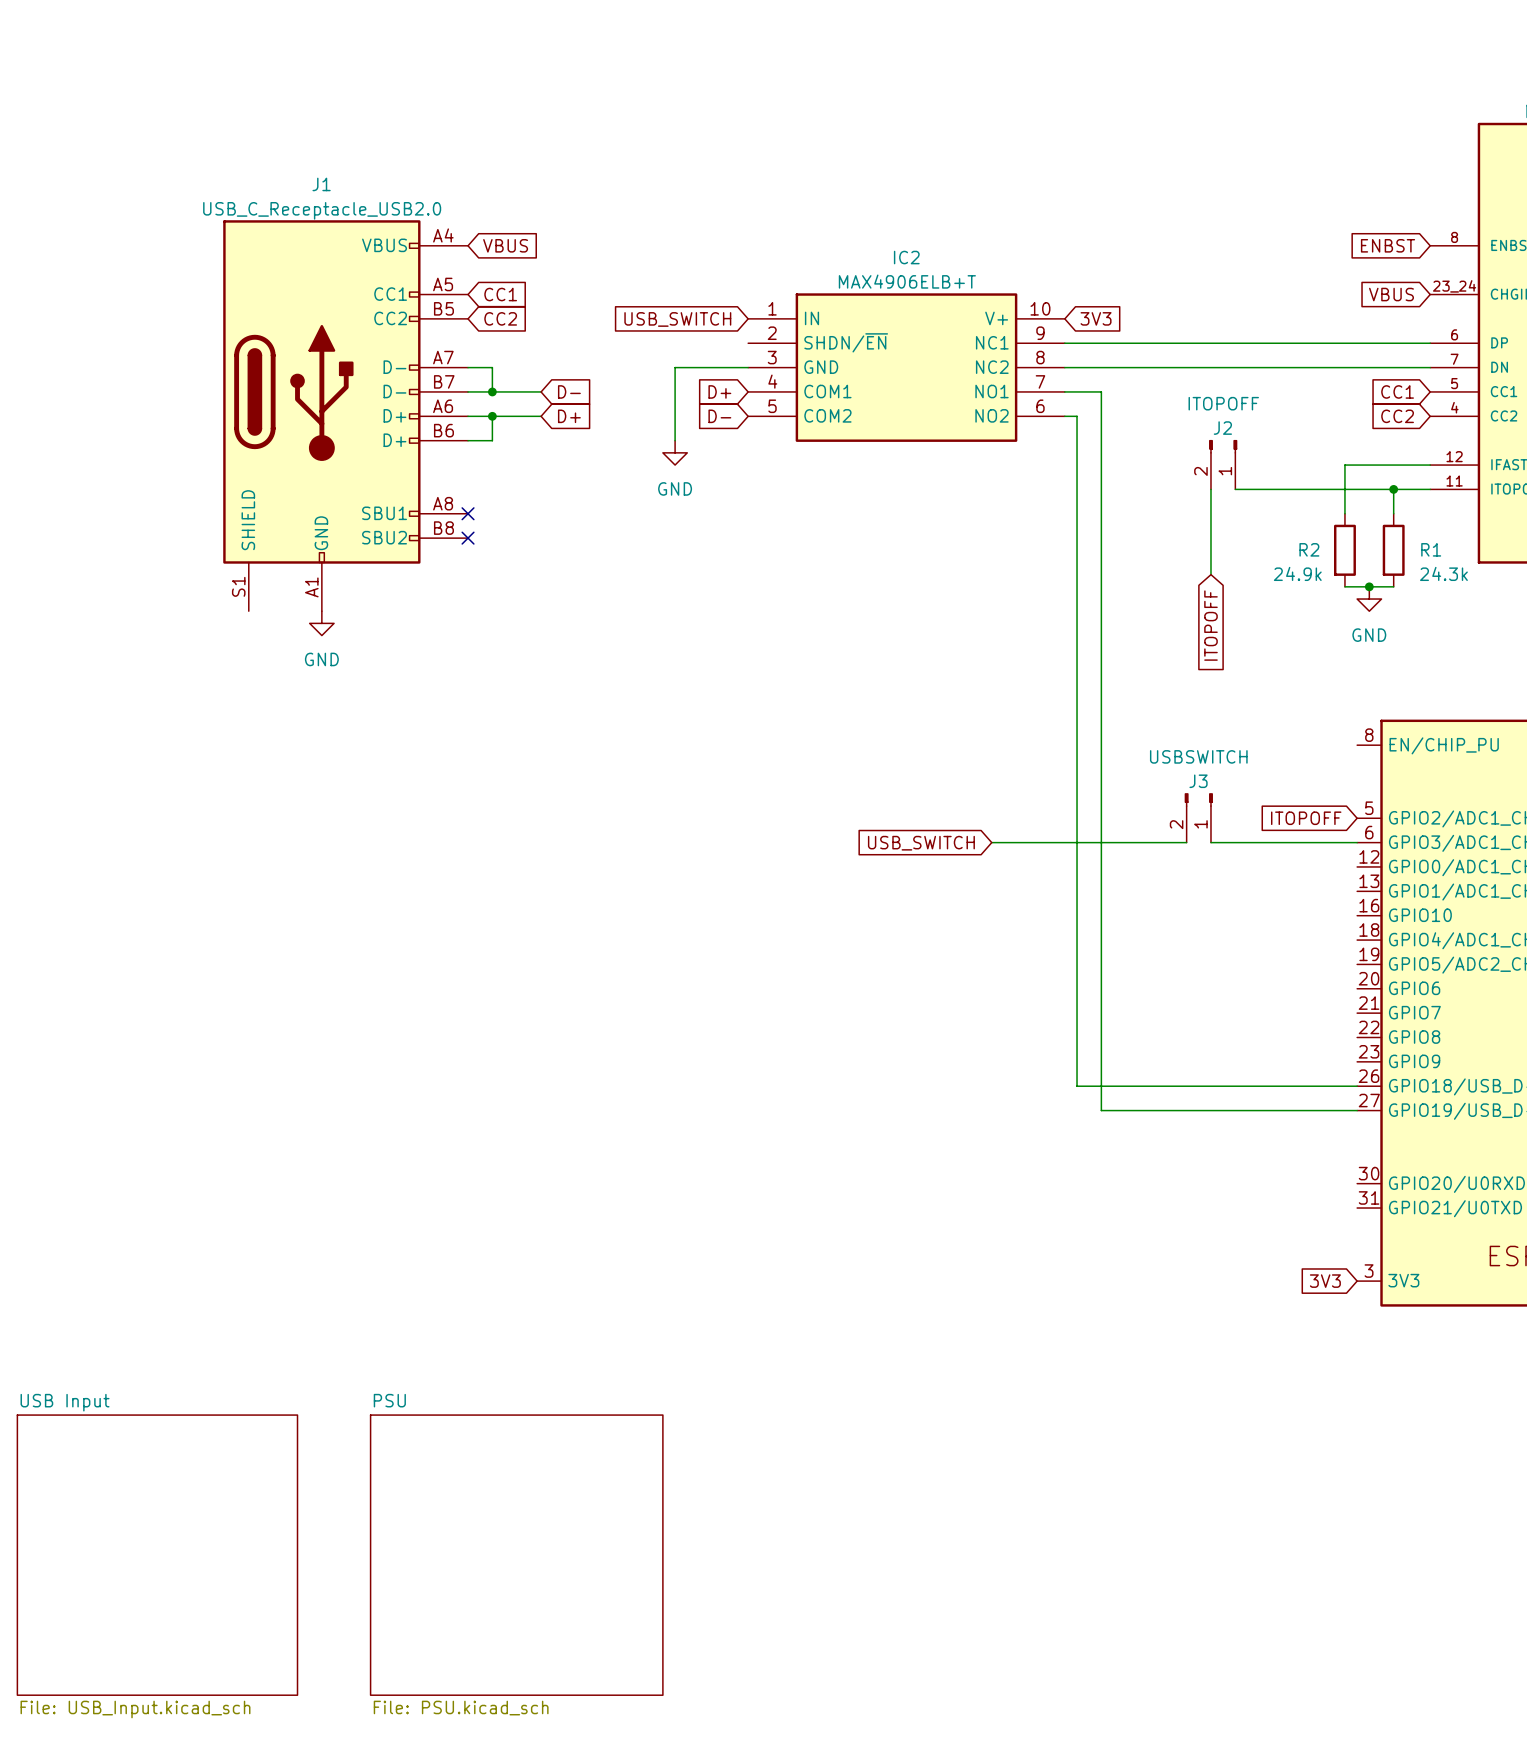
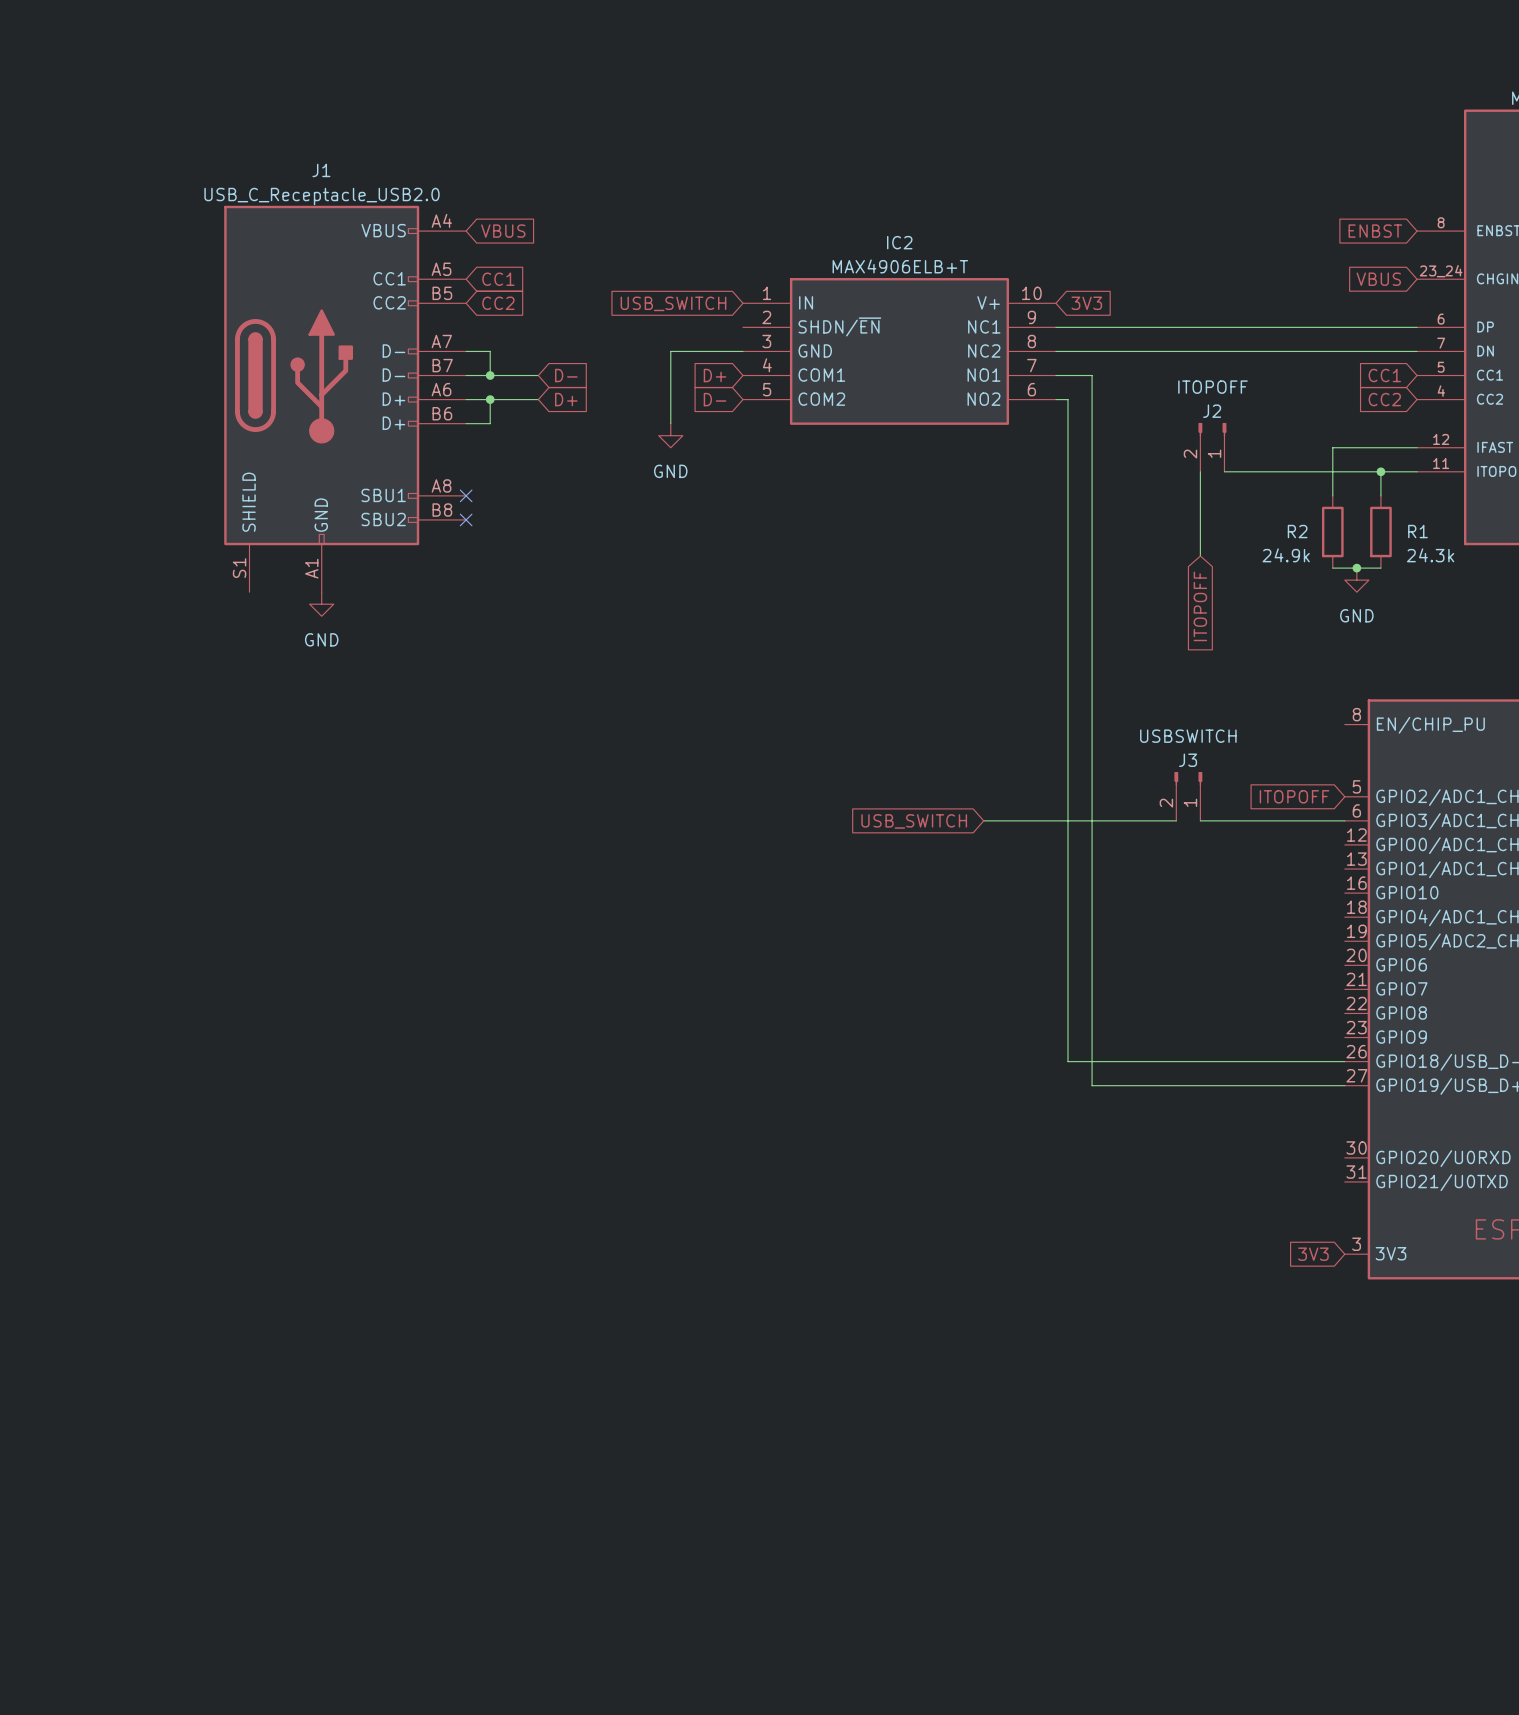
sheet USB Input: File: USB_Input.kicad_sch (157, 1555) -> none
sheet PSU: File: PSU.kicad_sch (516, 1555) -> none

